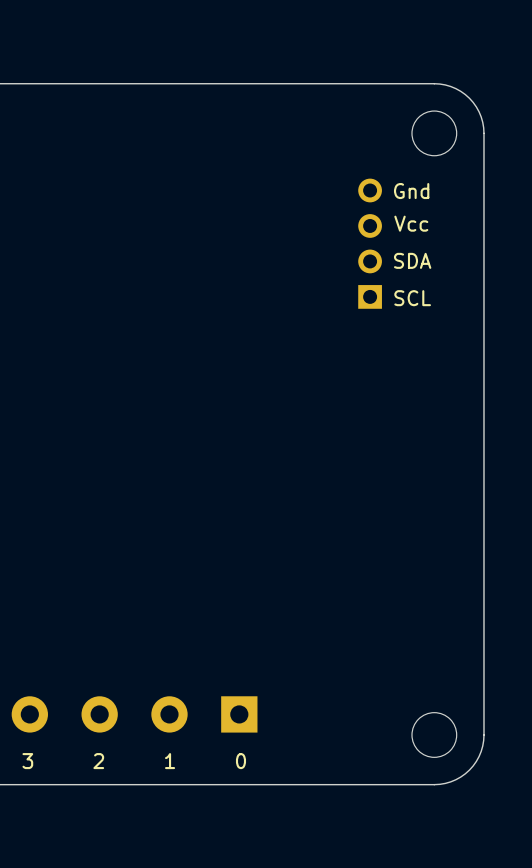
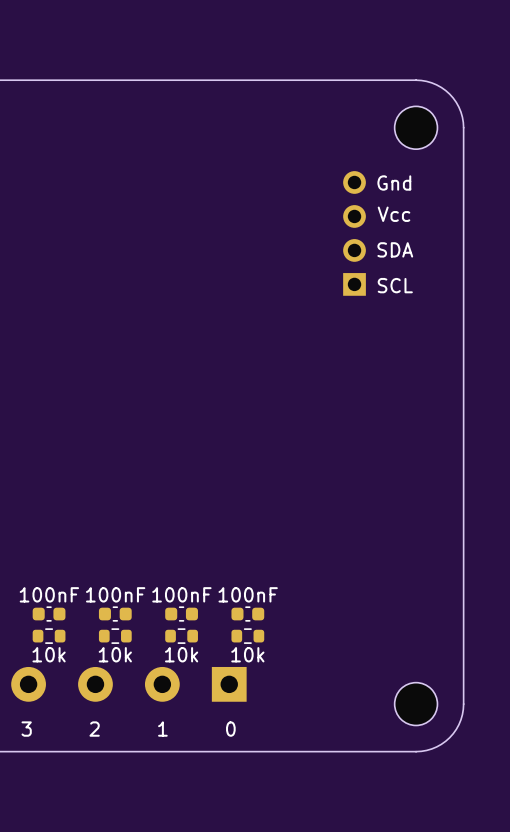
part: none -> 100nF (49, 614)
part: none -> 100nF (115, 614)
part: none -> 100nF (181, 614)
part: none -> 100nF (247, 614)
part: none -> 10k (49, 636)
part: none -> 10k (115, 636)
part: none -> 10k (181, 636)
part: none -> 10k (247, 636)

